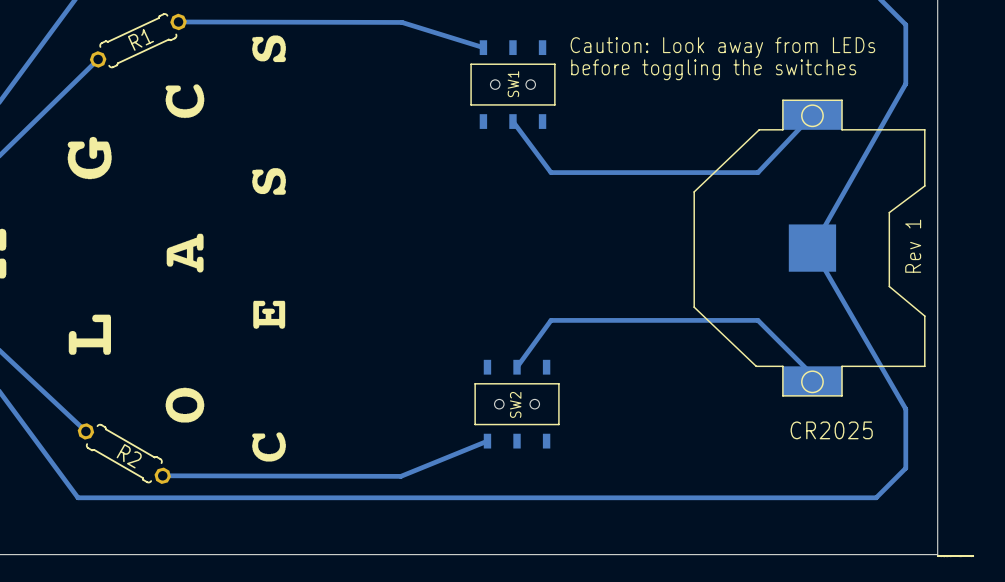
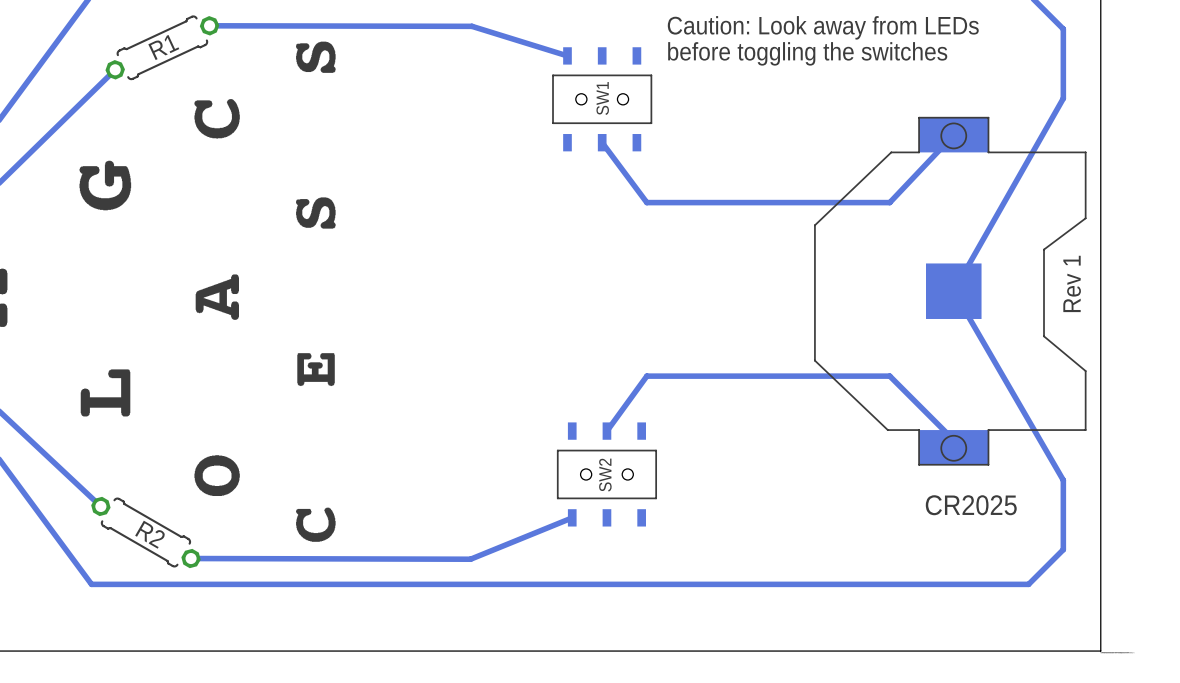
text: none -> Caution: Look away from LEDs (823, 27)
text: Caution: Look away from LEDs (722, 47) -> before toggling the switches (807, 53)
text: before toggling the switches (713, 69) -> none

